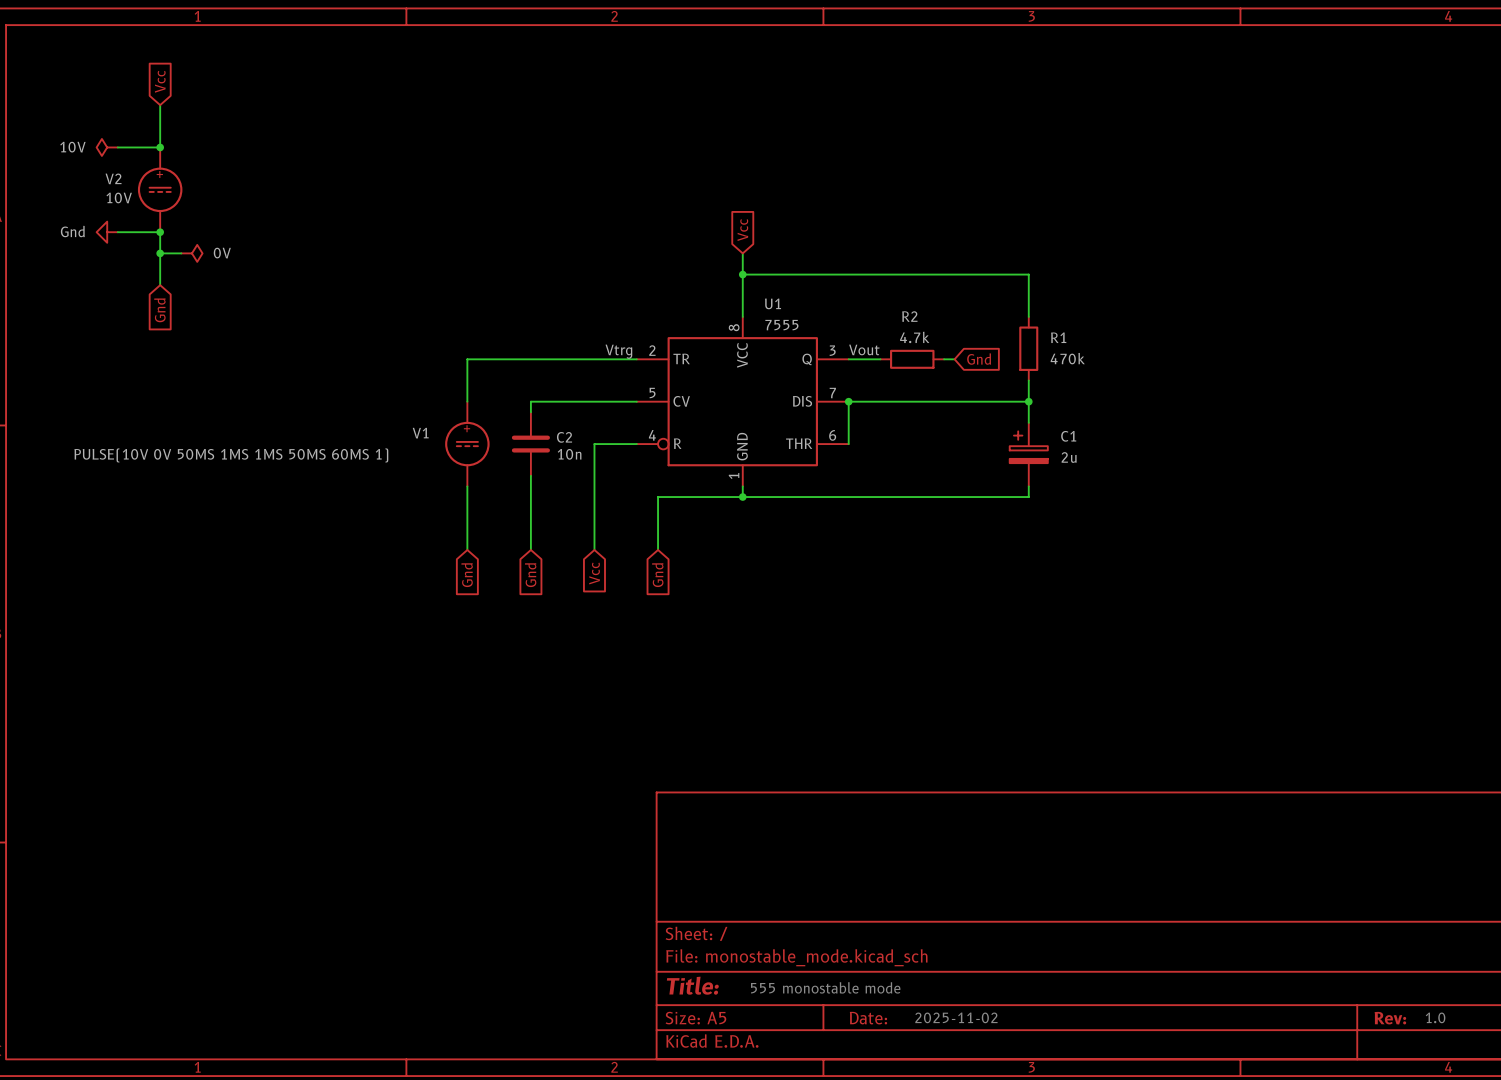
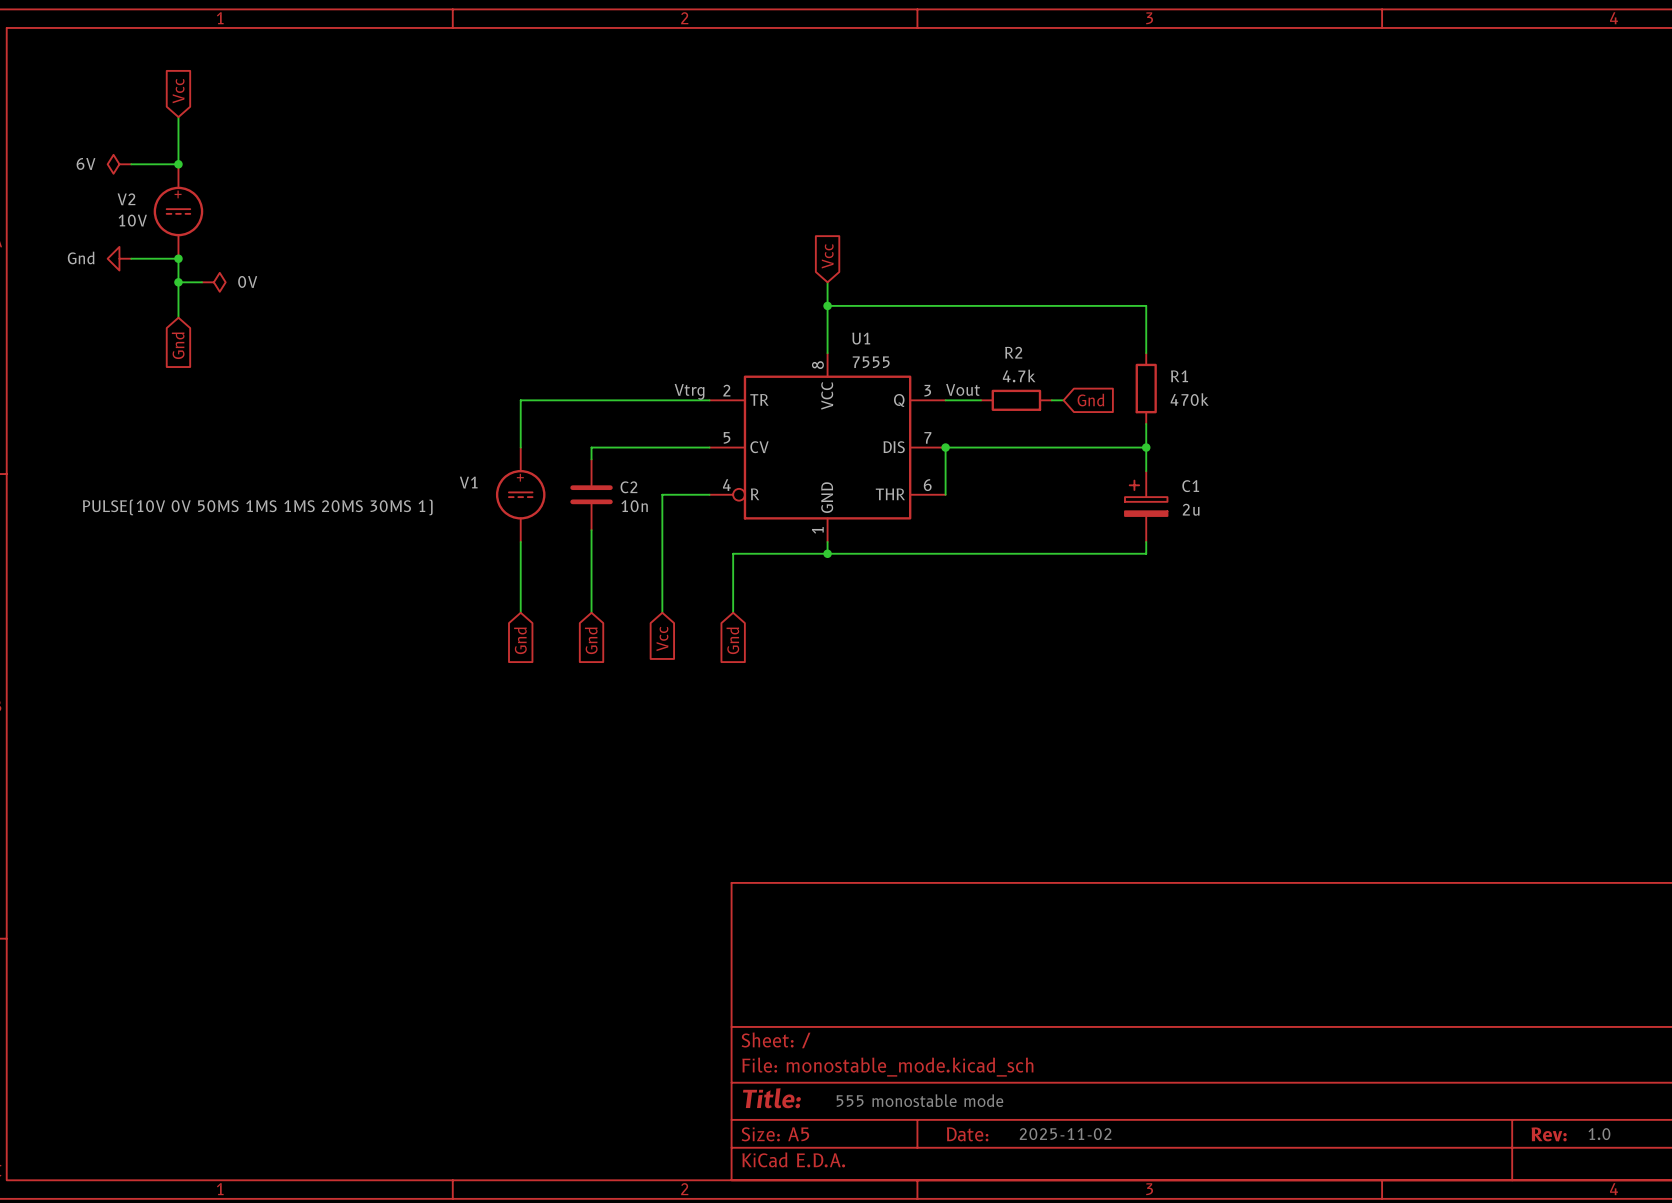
power symbol: 10V (107, 147) -> 6V (119, 164)
V1 value: PULSE(10V 0V 50MS 1MS 1MS 50MS 60MS 1) (231, 455) -> PULSE(10V 0V 50MS 1MS 1MS 20MS 30MS 1) (257, 507)

